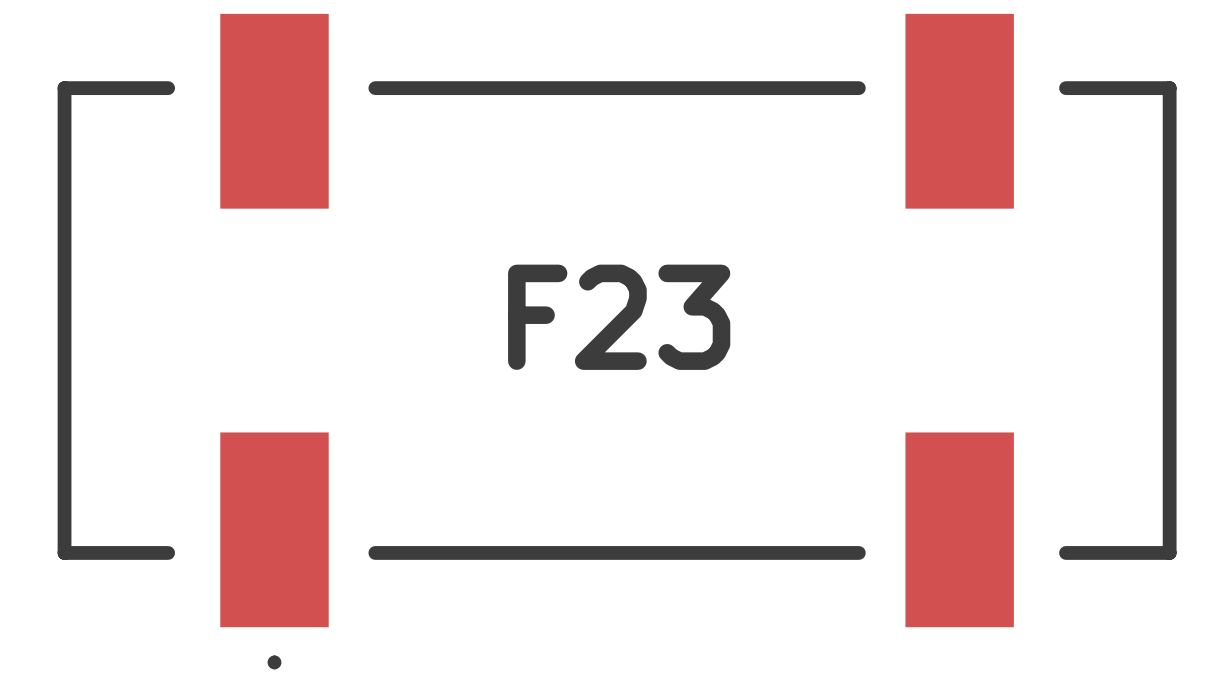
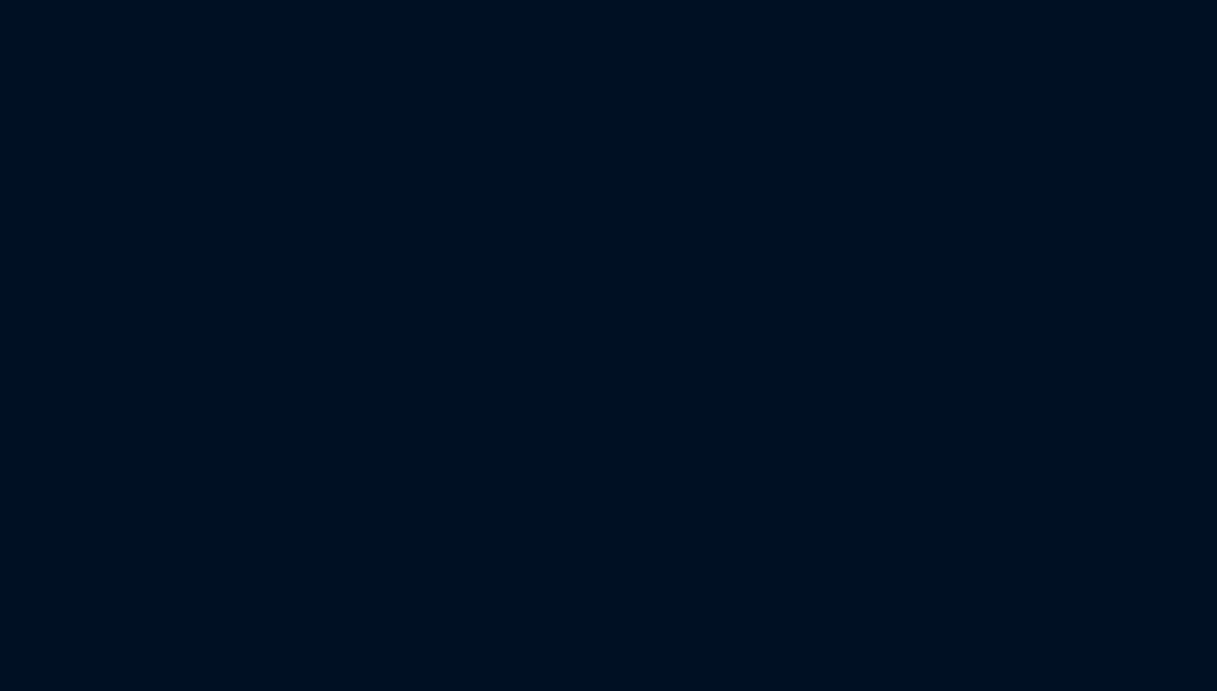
F23: (617, 341) -> none

